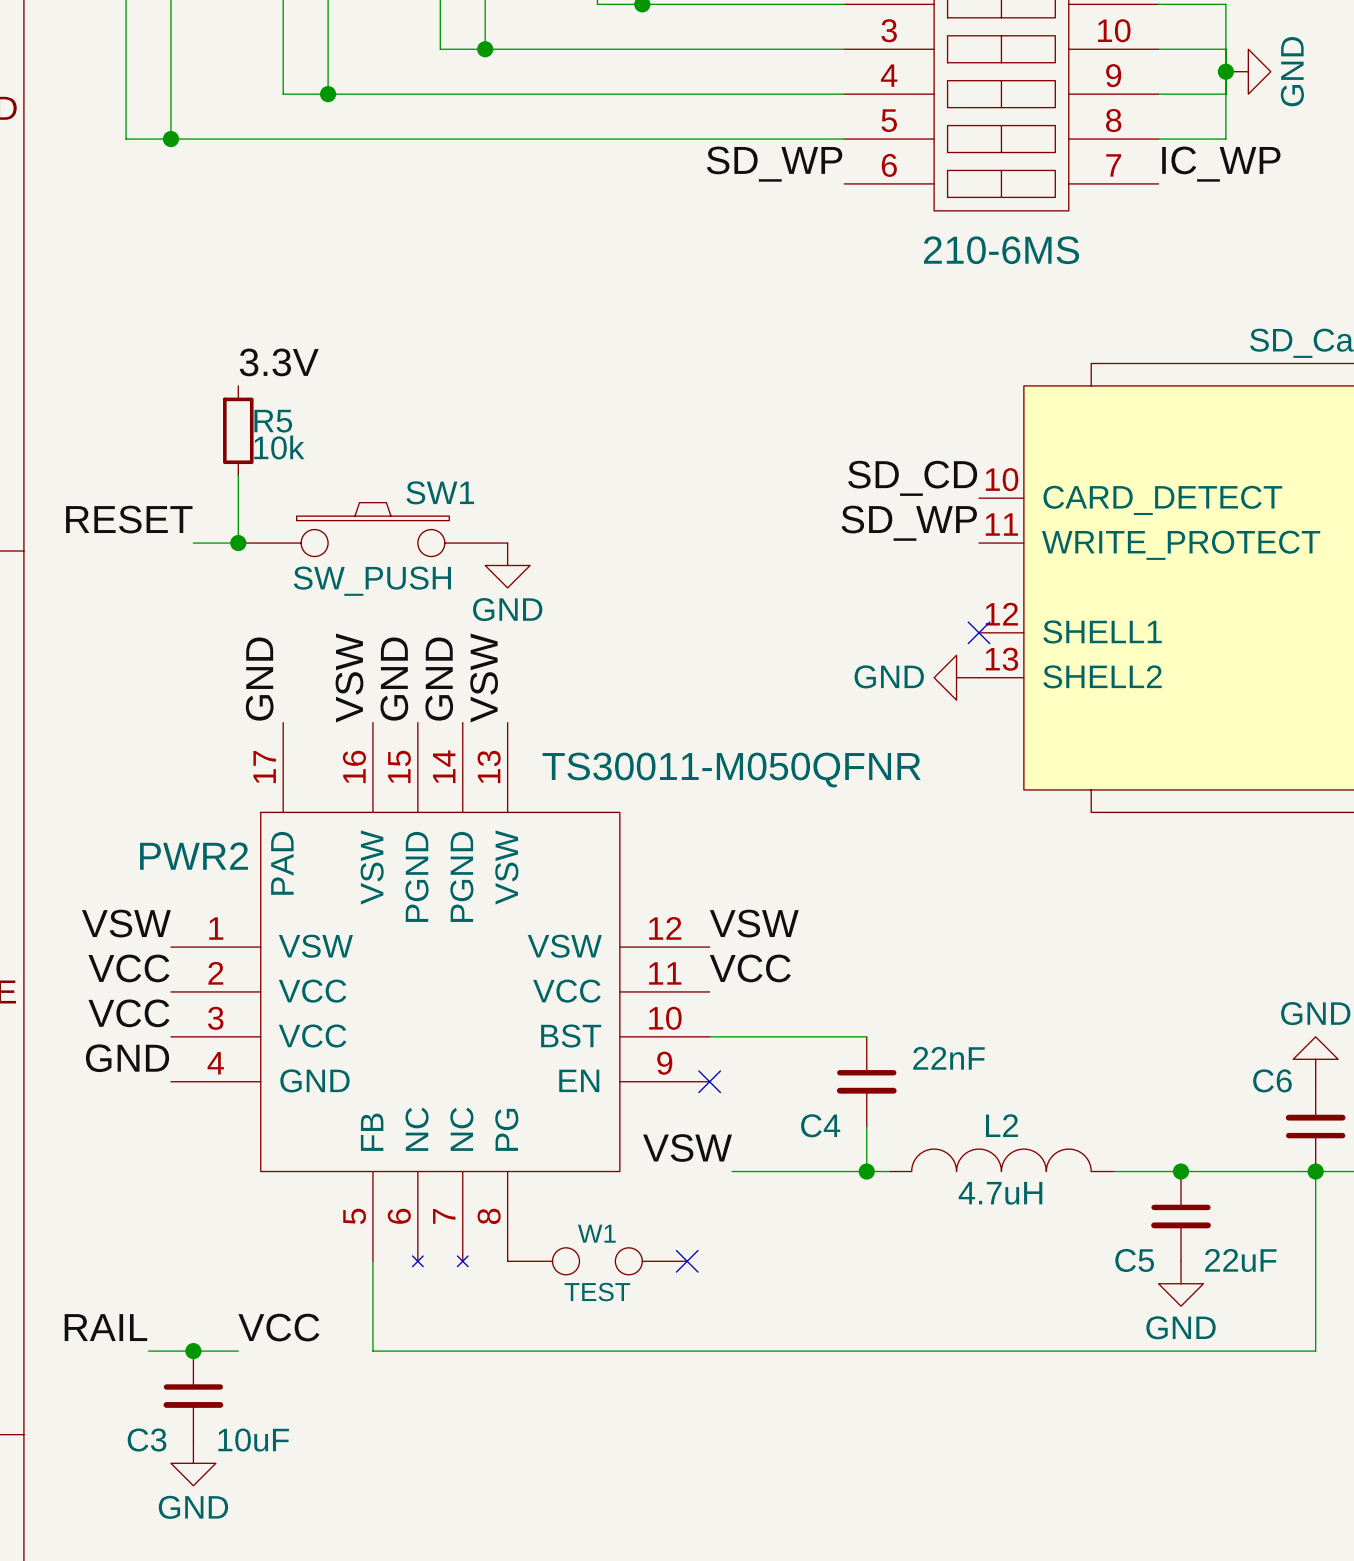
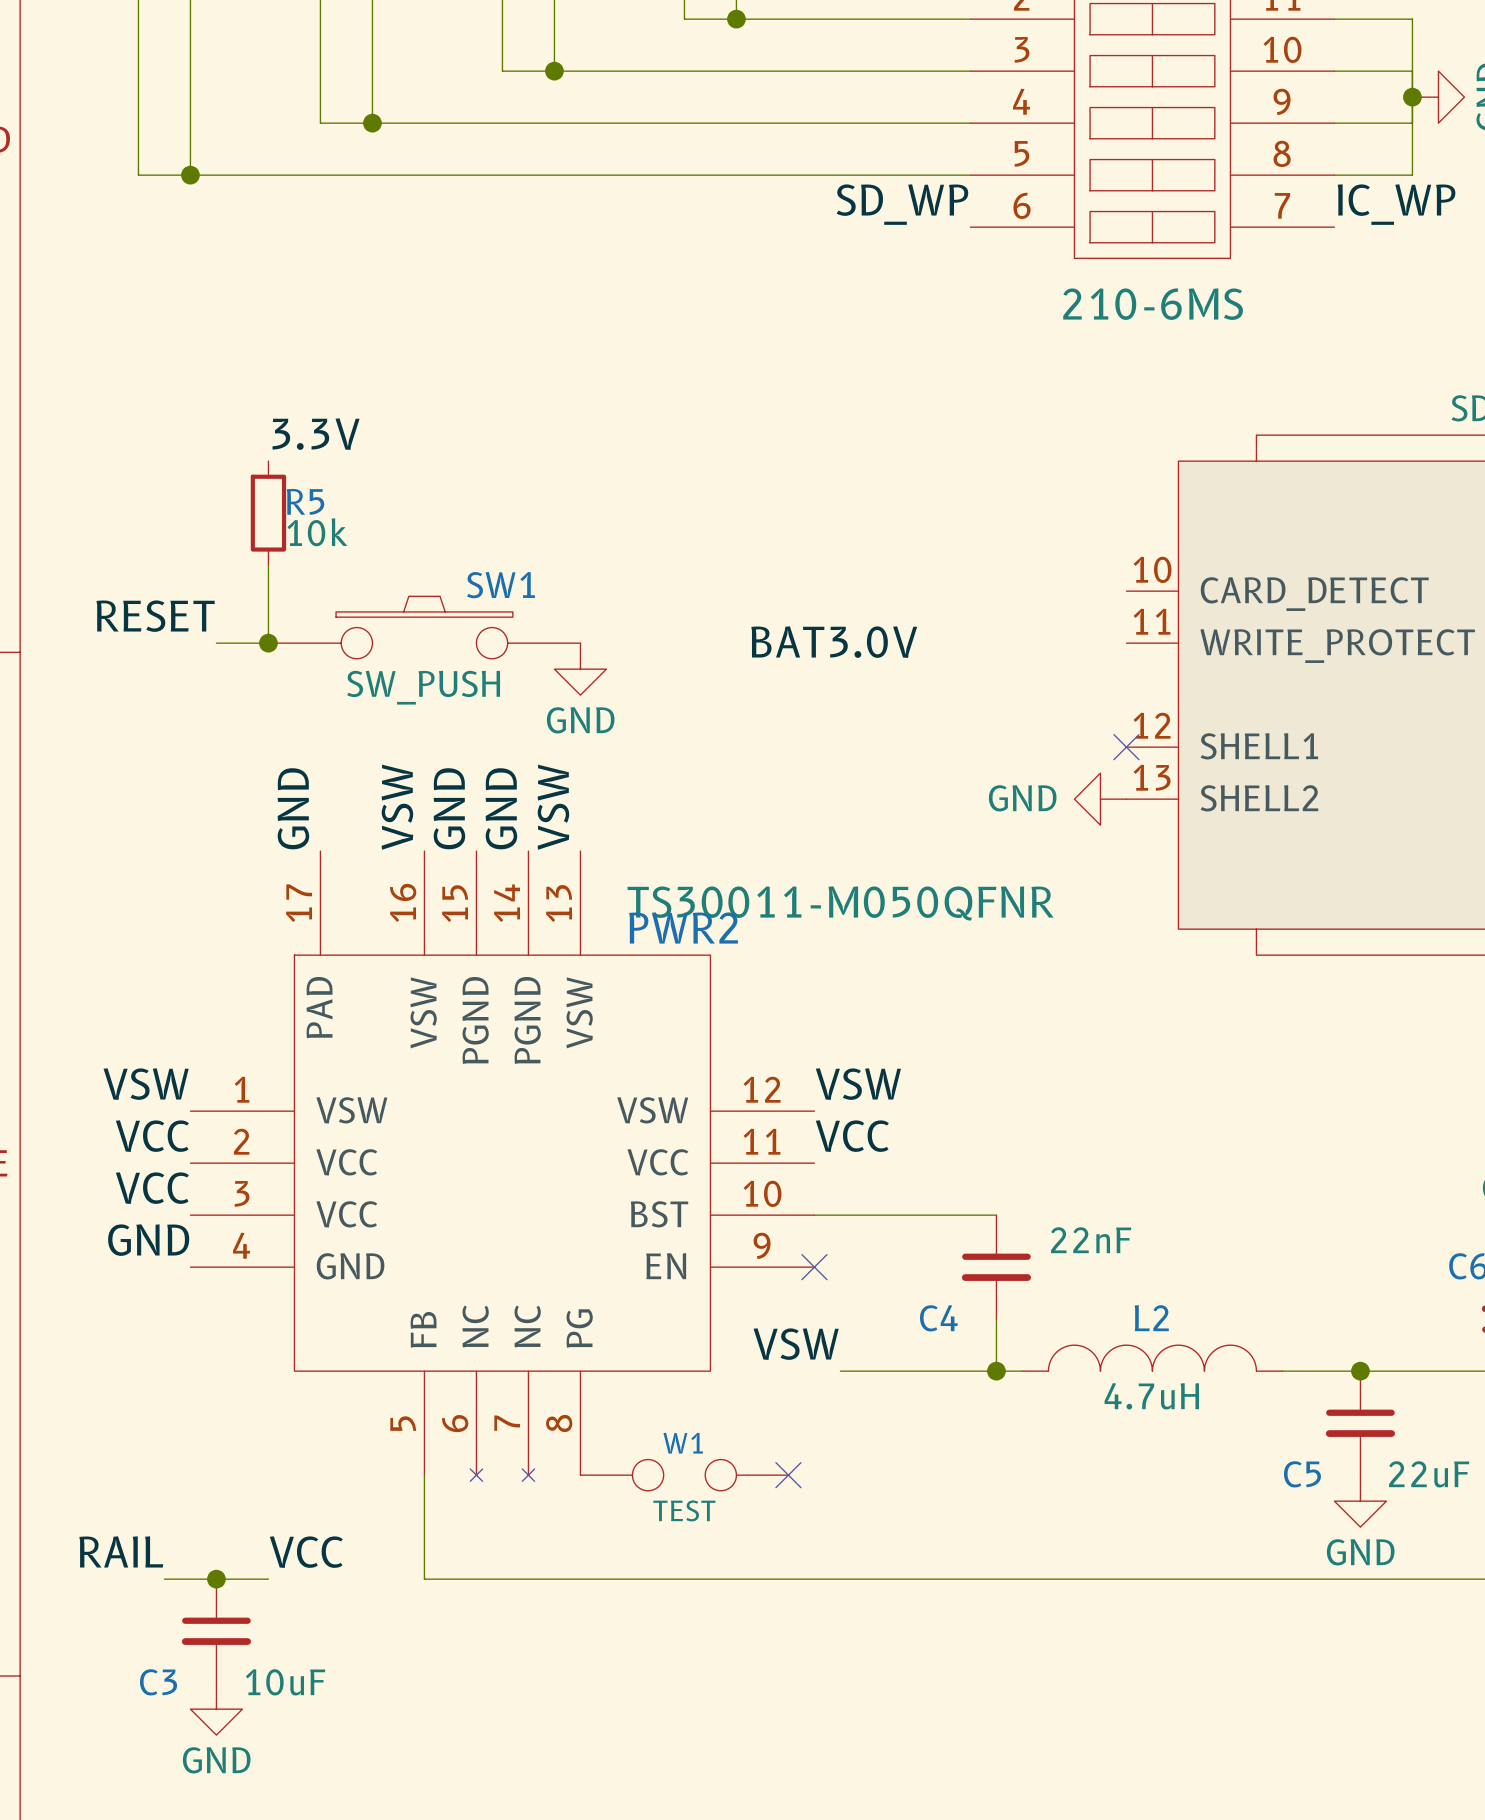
label: SD_CD (912, 478) -> none
label: SD_WP (909, 523) -> none
label: none -> BAT3.0V (834, 642)
PWR2 name position: PWR2 (194, 856) -> PWR2 (683, 927)

